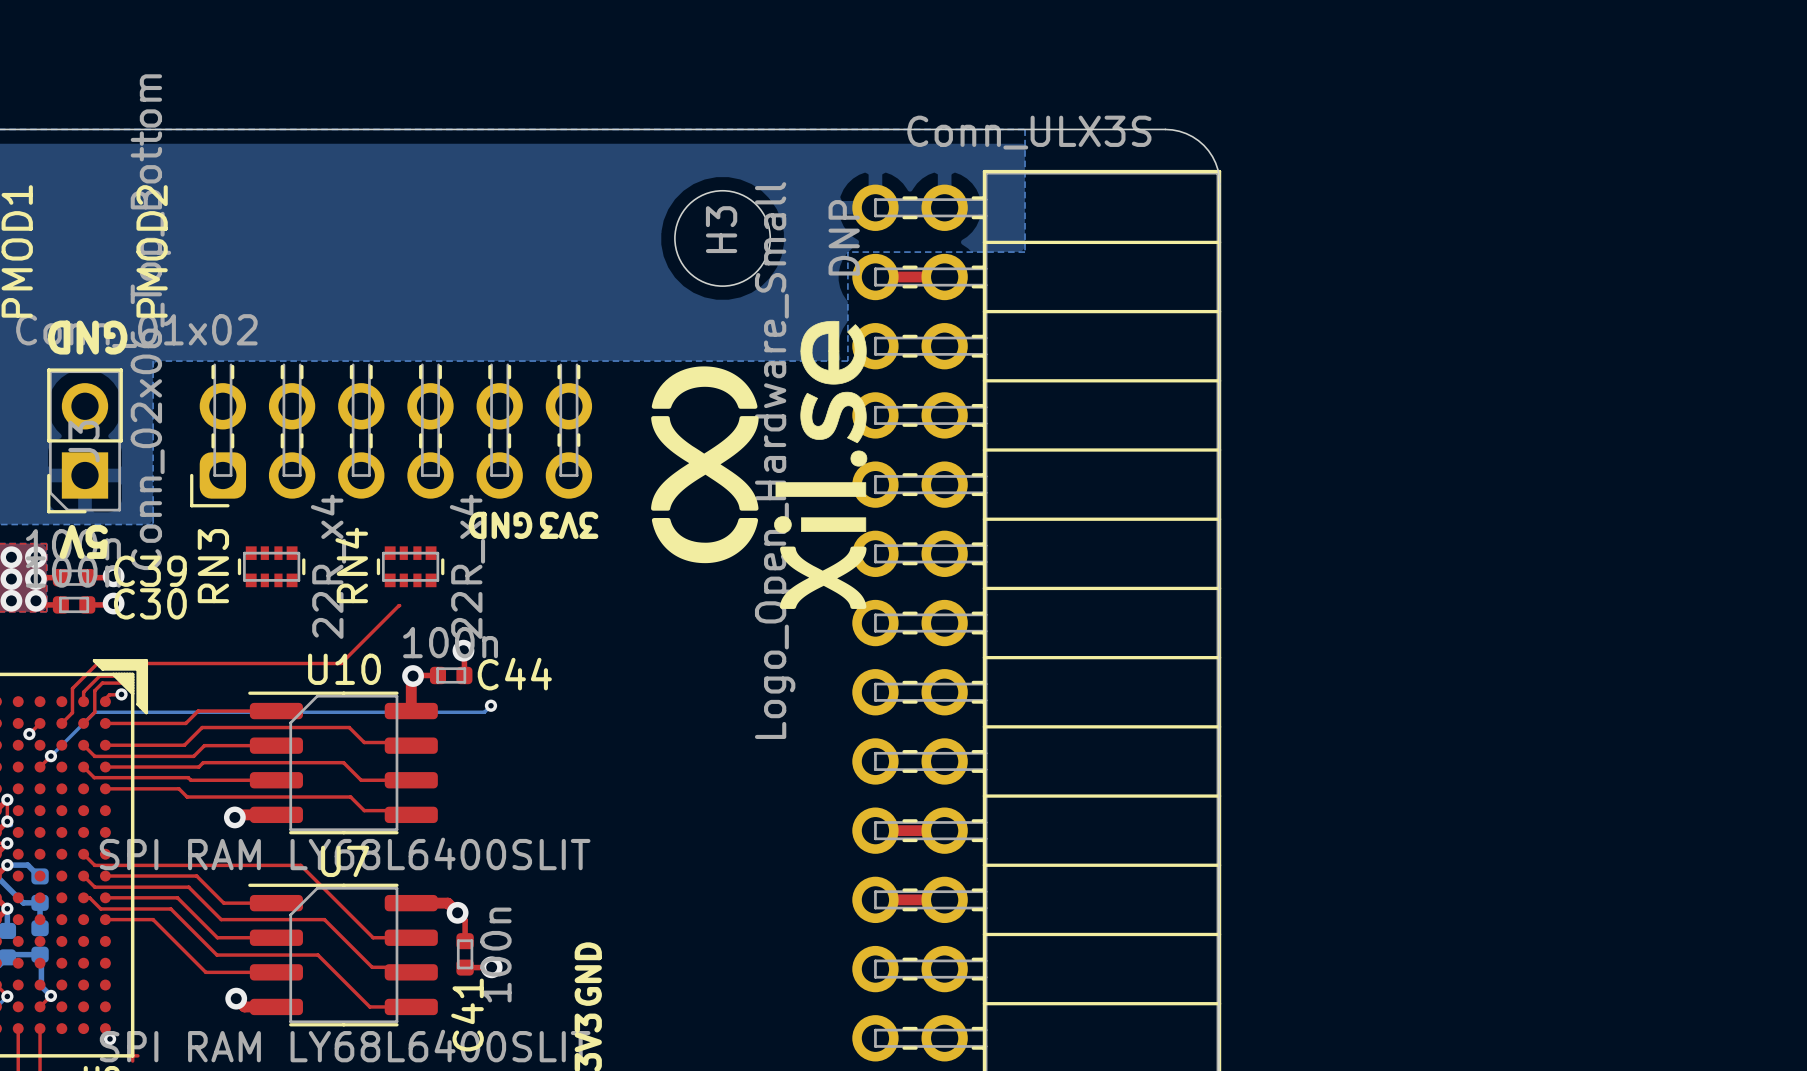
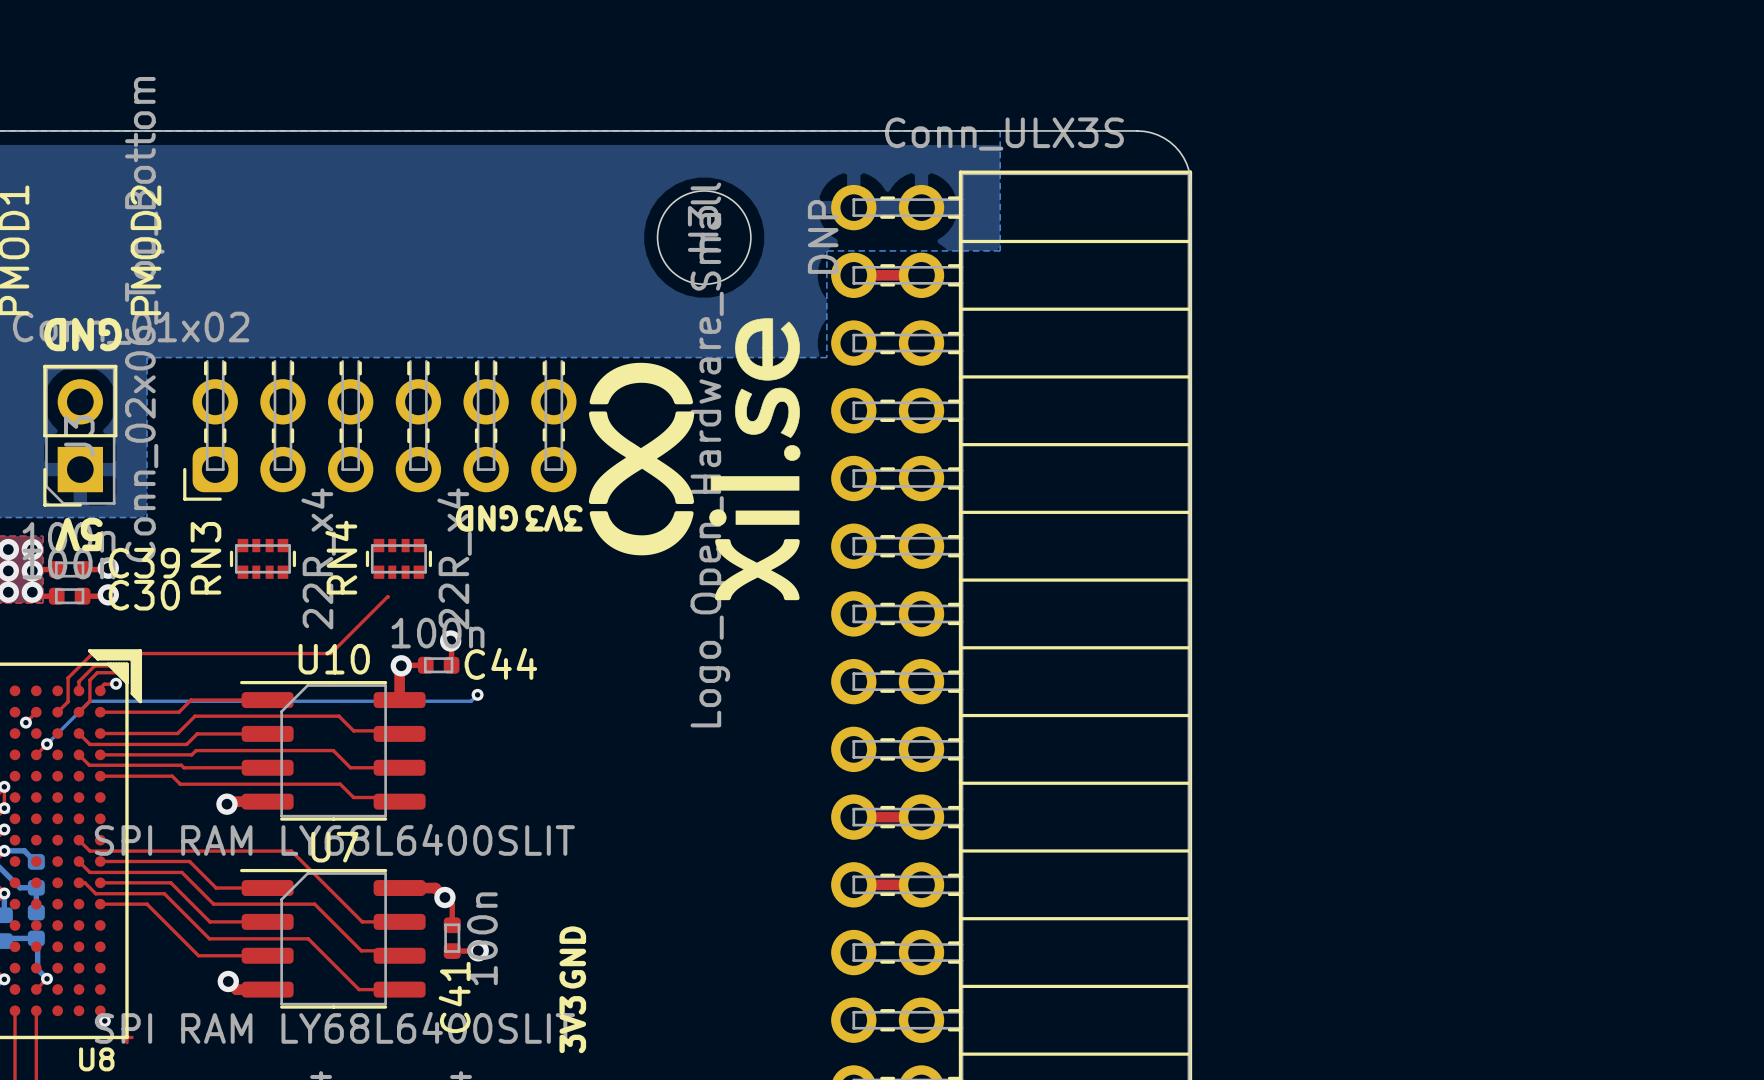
drawing position: (759, 464) -> (694, 459)

